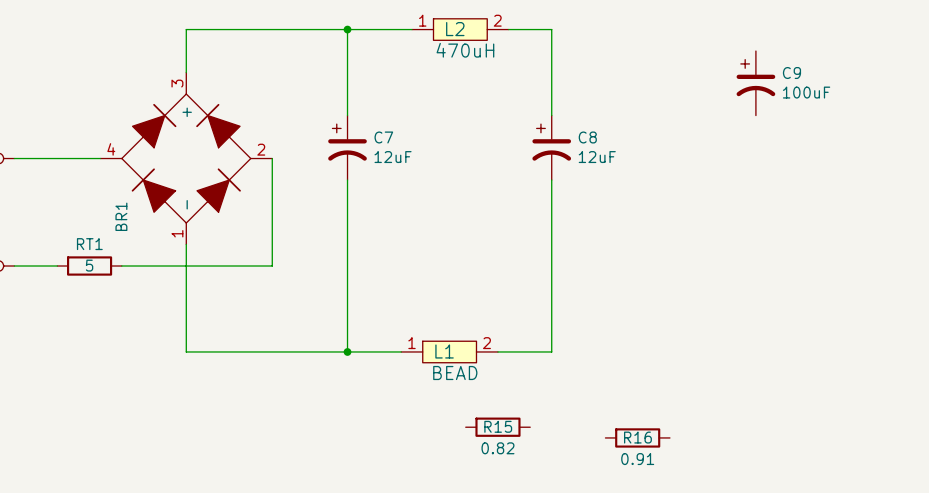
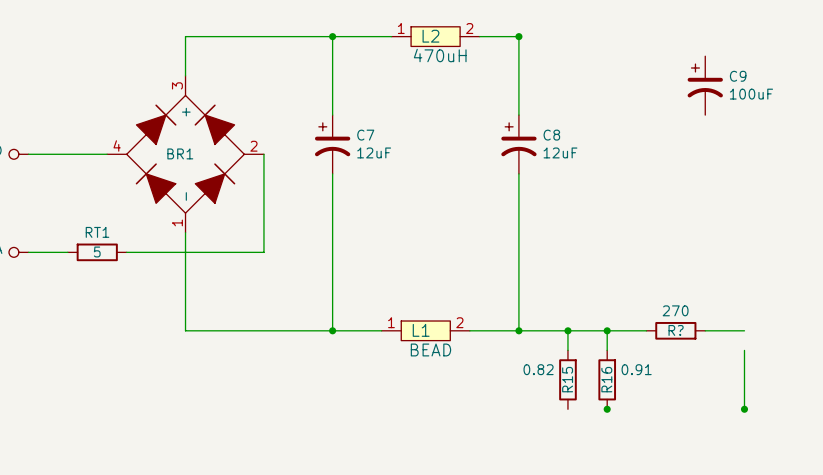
junction: none -> (518, 36)
BR1 name rotation: 0° (121, 216) -> 90° clockwise (180, 153)
BR1 name position: BR1 (121, 216) -> BR1 (180, 153)
wire: none -> (518, 330) (646, 330)
junction: none -> (518, 330)
wire: none -> (567, 330) (567, 350)
junction: none -> (567, 330)
wire: none -> (607, 330) (607, 350)
junction: none -> (607, 330)
R?: none -> 270 (675, 330)
wire: none -> (705, 330) (744, 330)
wire: none -> (744, 350) (744, 409)
R15 rotation: 0° (497, 427) -> 90° clockwise (567, 379)
R15 position: (497, 427) -> (567, 379)
R16 rotation: 0° (637, 437) -> 90° clockwise (607, 379)
junction: none -> (607, 409)
junction: none -> (744, 409)
R16 value position: 0.91 (637, 459) -> 0.91 (636, 369)

